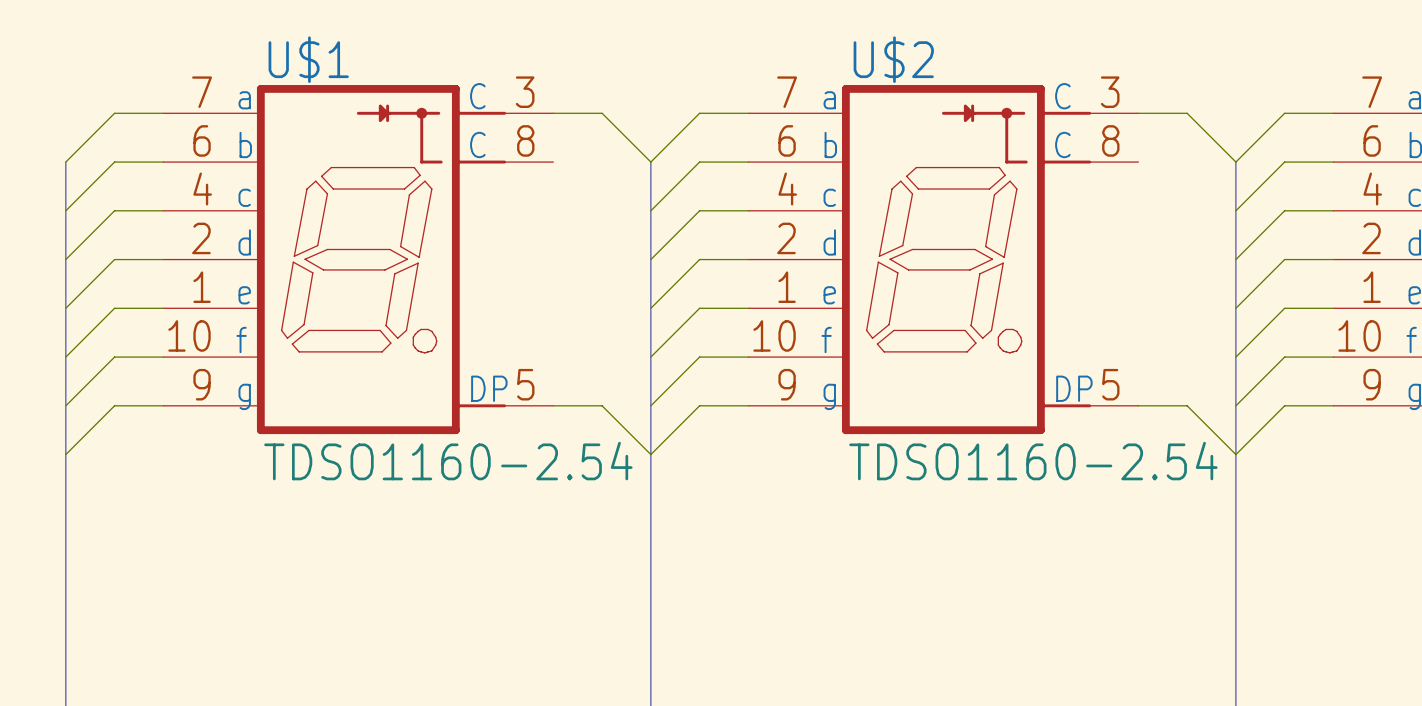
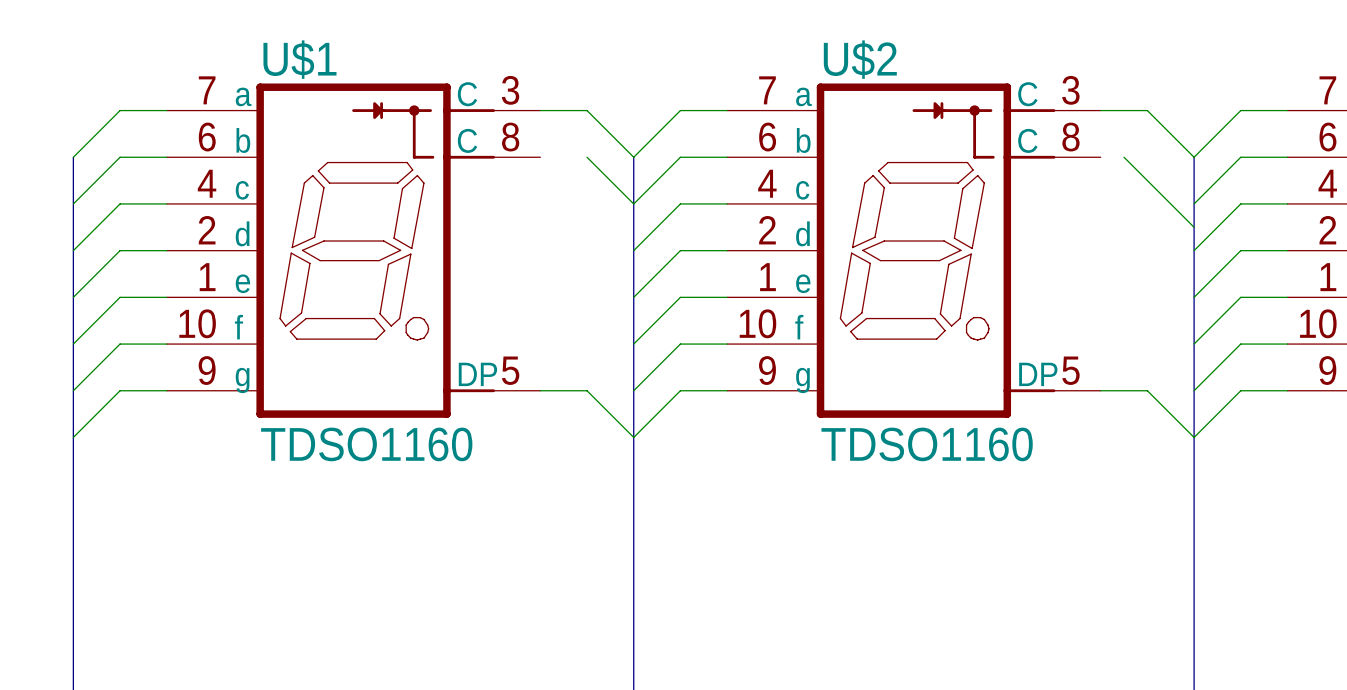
wire: none -> (587, 157) (633, 203)
wire: none -> (1124, 157) (1194, 227)
U$1 value: TDSO1160-2.54 (448, 461) -> TDSO1160 (366, 444)
U$2 value: TDSO1160-2.54 (1033, 461) -> TDSO1160 (927, 444)

